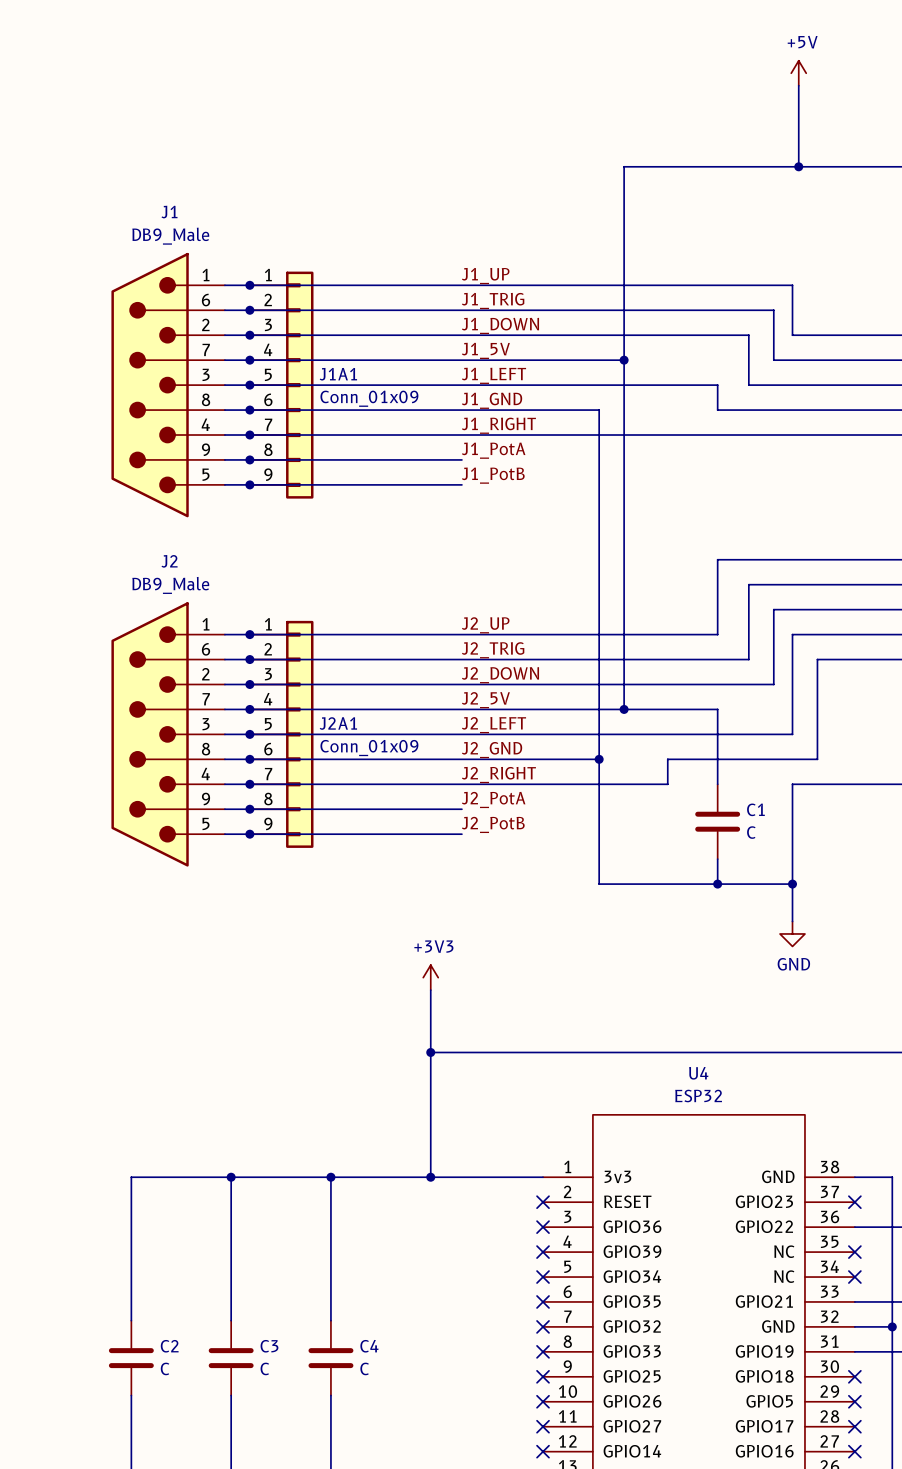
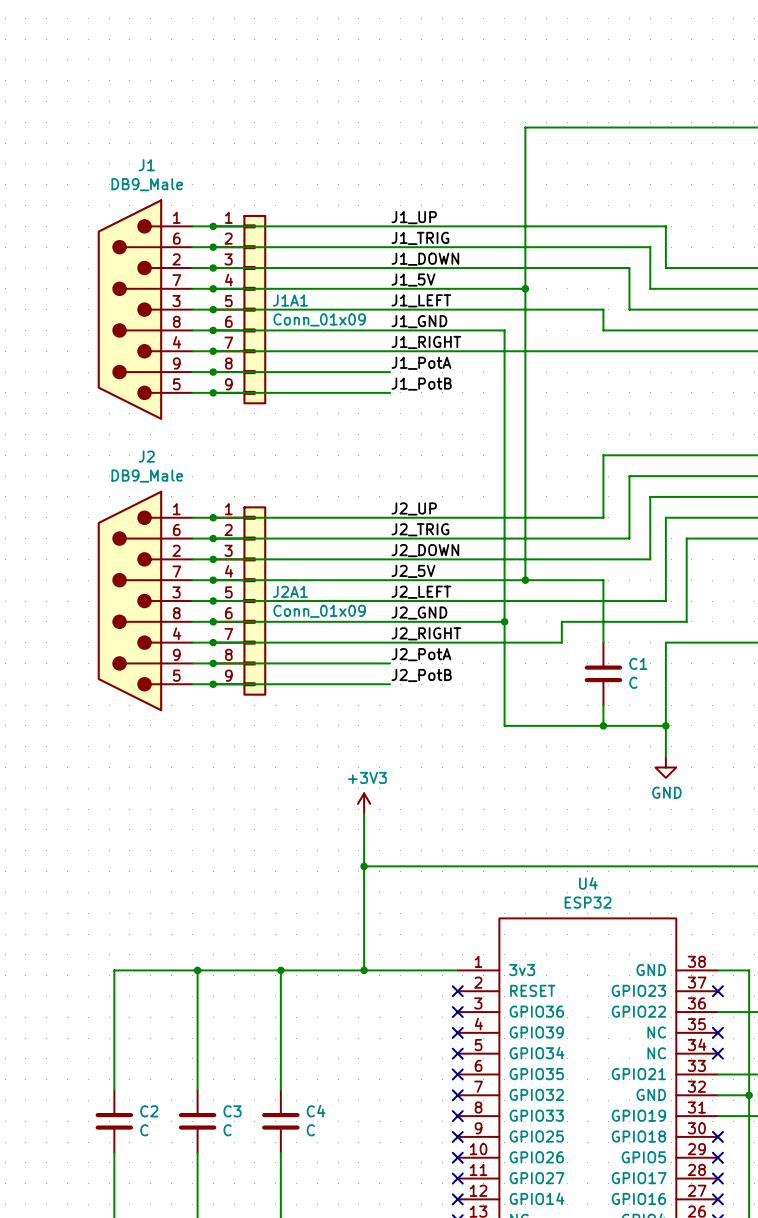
power symbol: +5V (798, 73) -> none
wire: (798, 85) (798, 166) -> none
junction: (798, 166) -> none

